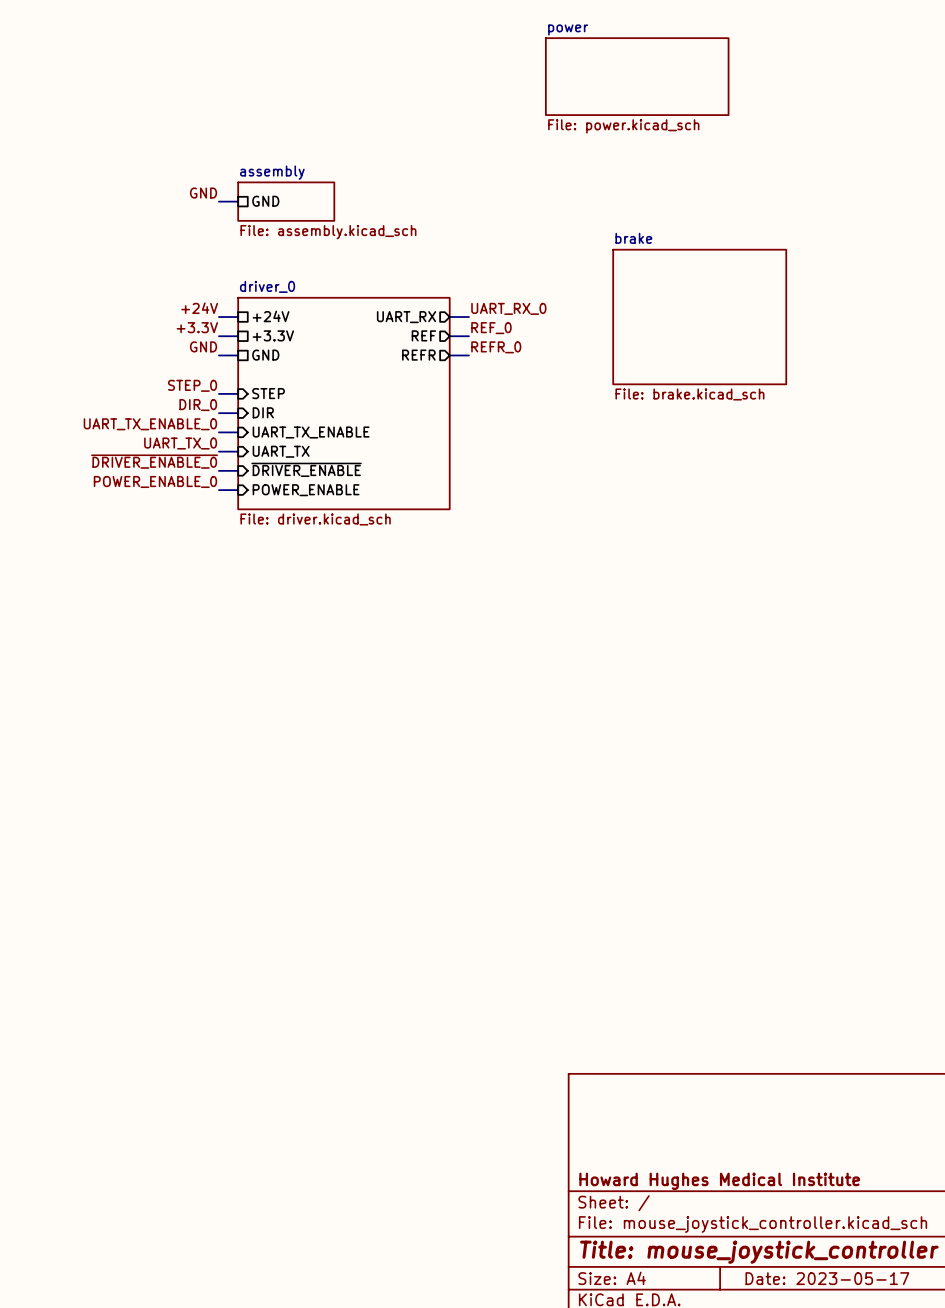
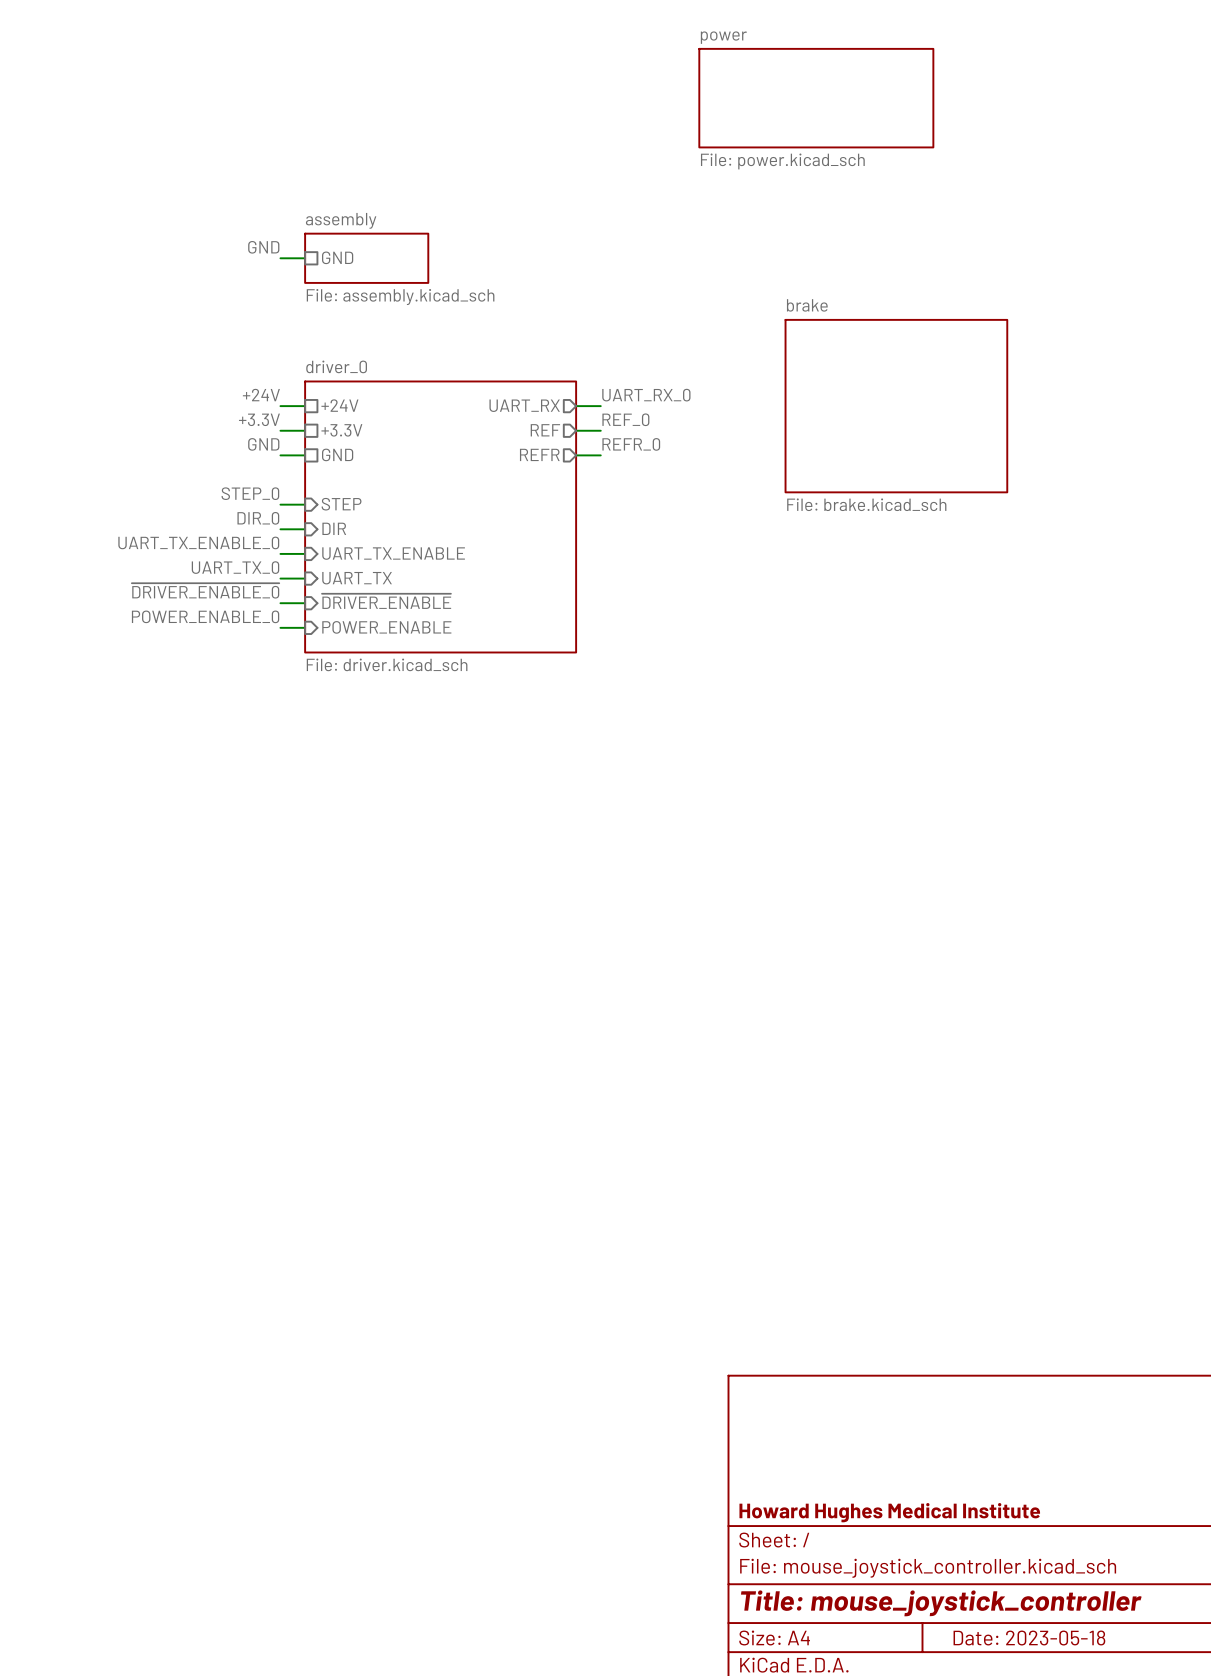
title block: Date: 2023-05-17 (827, 1278) -> Date: 2023-05-18 (1029, 1638)

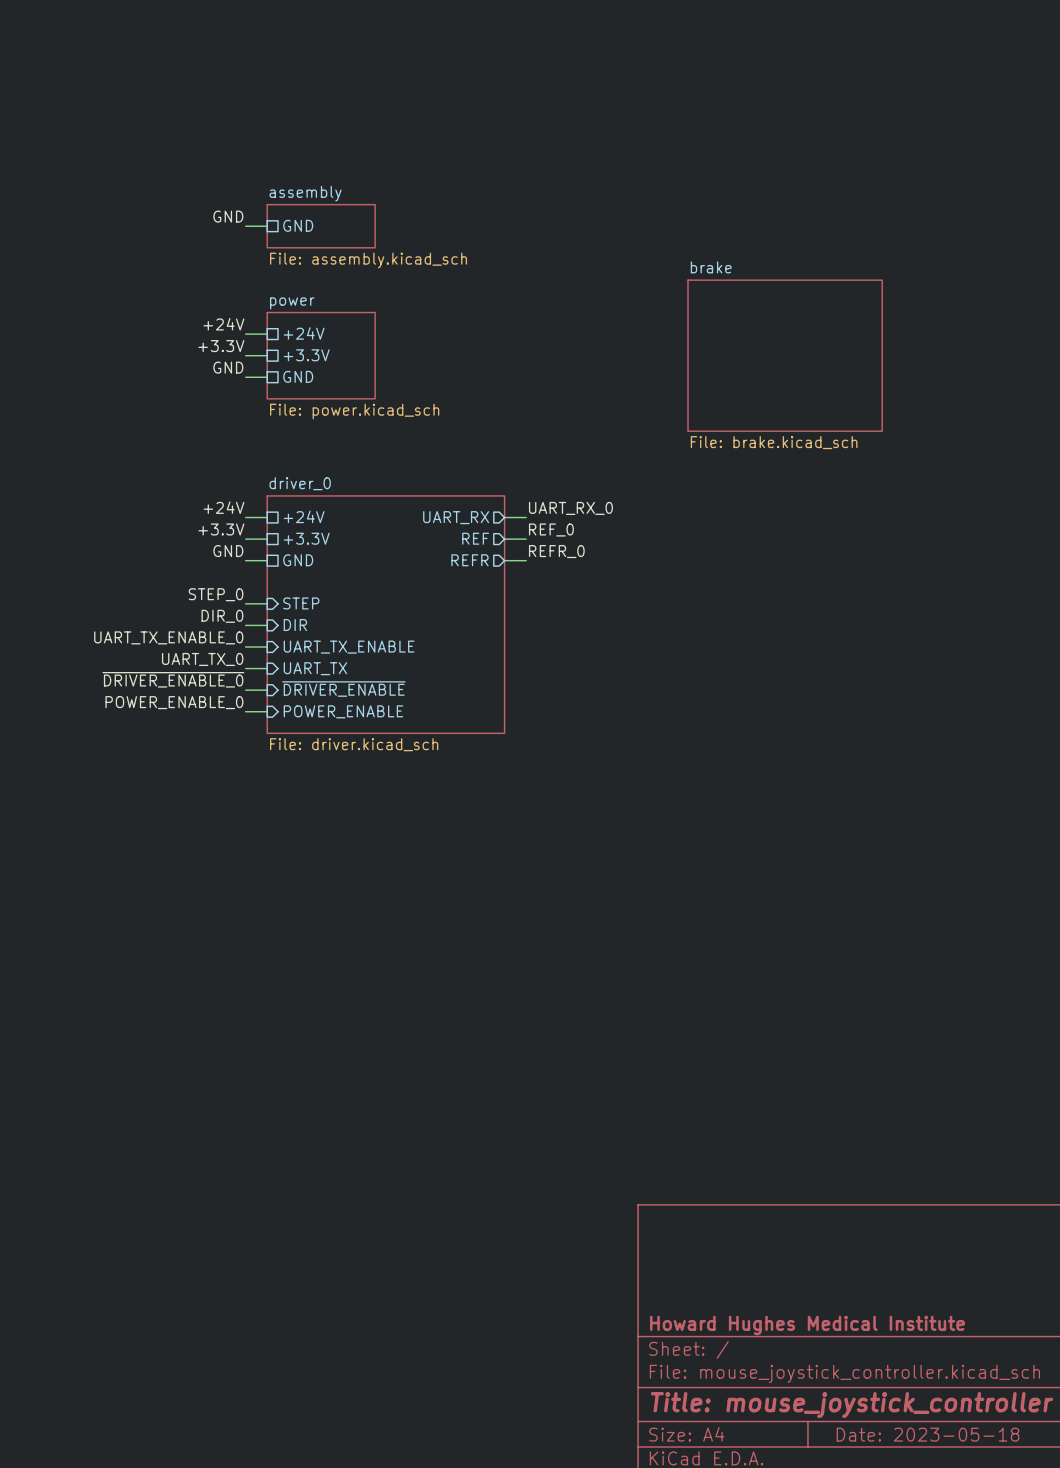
sheet power: File: power.kicad_sch (816, 98) -> none
label: none -> +24V (223, 324)
sheet pin: none -> +24V (304, 333)
wire: none -> (245, 334) (267, 334)
label: +24V (261, 395) -> +3.3V (221, 346)
label position: UART_RX_0 (646, 395) -> UART_RX_0 (570, 508)
sheet pin: +24V (339, 405) -> +3.3V (306, 355)
sheet pin position: UART_RX (524, 405) -> UART_RX (456, 517)
sheet power: none -> File: power.kicad_sch (321, 355)
wire: (576, 406) (600, 406) -> (504, 517) (526, 517)
label: +3.3V (259, 419) -> GND (228, 367)
label position: REF_0 (625, 419) -> REF_0 (551, 529)
sheet pin: +3.3V (341, 430) -> GND (298, 376)
sheet pin position: REF (545, 430) -> REF (475, 538)
wire: (576, 430) (600, 430) -> (504, 539) (526, 539)
label position: GND (263, 444) -> GND (228, 551)
label position: REFR_0 (631, 444) -> REFR_0 (556, 551)
sheet pin position: GND (337, 454) -> GND (298, 560)
sheet pin position: REFR (539, 454) -> REFR (470, 560)
wire: (280, 455) (305, 455) -> (245, 560) (267, 560)
wire: (576, 455) (600, 455) -> (504, 560) (526, 560)
label position: STEP_0 (250, 493) -> STEP_0 (216, 594)
wire: (280, 504) (305, 504) -> (245, 603) (267, 603)
sheet pin position: STEP (341, 504) -> STEP (301, 603)
sheet driver_0 position: (440, 516) -> (385, 614)
label position: DIR_0 (258, 518) -> DIR_0 (222, 616)
sheet pin position: DIR (334, 528) -> DIR (295, 625)
wire: (280, 529) (305, 529) -> (245, 625) (267, 625)
label position: UART_TX_ENABLE_0 (198, 542) -> UART_TX_ENABLE_0 (168, 637)
wire: (280, 553) (305, 553) -> (245, 647) (267, 647)
sheet pin position: UART_TX_ENABLE (393, 553) -> UART_TX_ENABLE (349, 647)
label position: UART_TX_0 (235, 567) -> UART_TX_0 (202, 659)
wire: (280, 578) (305, 578) -> (245, 668) (267, 668)
sheet pin position: UART_TX (357, 578) -> UART_TX (315, 668)
label: none -> +24V (223, 507)
label position: ~{DRIVER_ENABLE_0} (205, 590) -> ~{DRIVER_ENABLE_0} (173, 679)
wire: none -> (245, 517) (267, 517)
sheet pin: none -> +24V (304, 516)
sheet pin position: ~{DRIVER_ENABLE} (386, 601) -> ~{DRIVER_ENABLE} (343, 689)
wire: (280, 603) (305, 603) -> (245, 690) (267, 690)
label: none -> +3.3V (221, 529)
wire: none -> (245, 539) (267, 539)
sheet pin: none -> +3.3V (306, 538)
label position: POWER_ENABLE_0 (205, 616) -> POWER_ENABLE_0 (174, 702)
wire: (280, 627) (305, 627) -> (245, 711) (267, 711)
sheet pin position: POWER_ENABLE (386, 627) -> POWER_ENABLE (343, 711)

